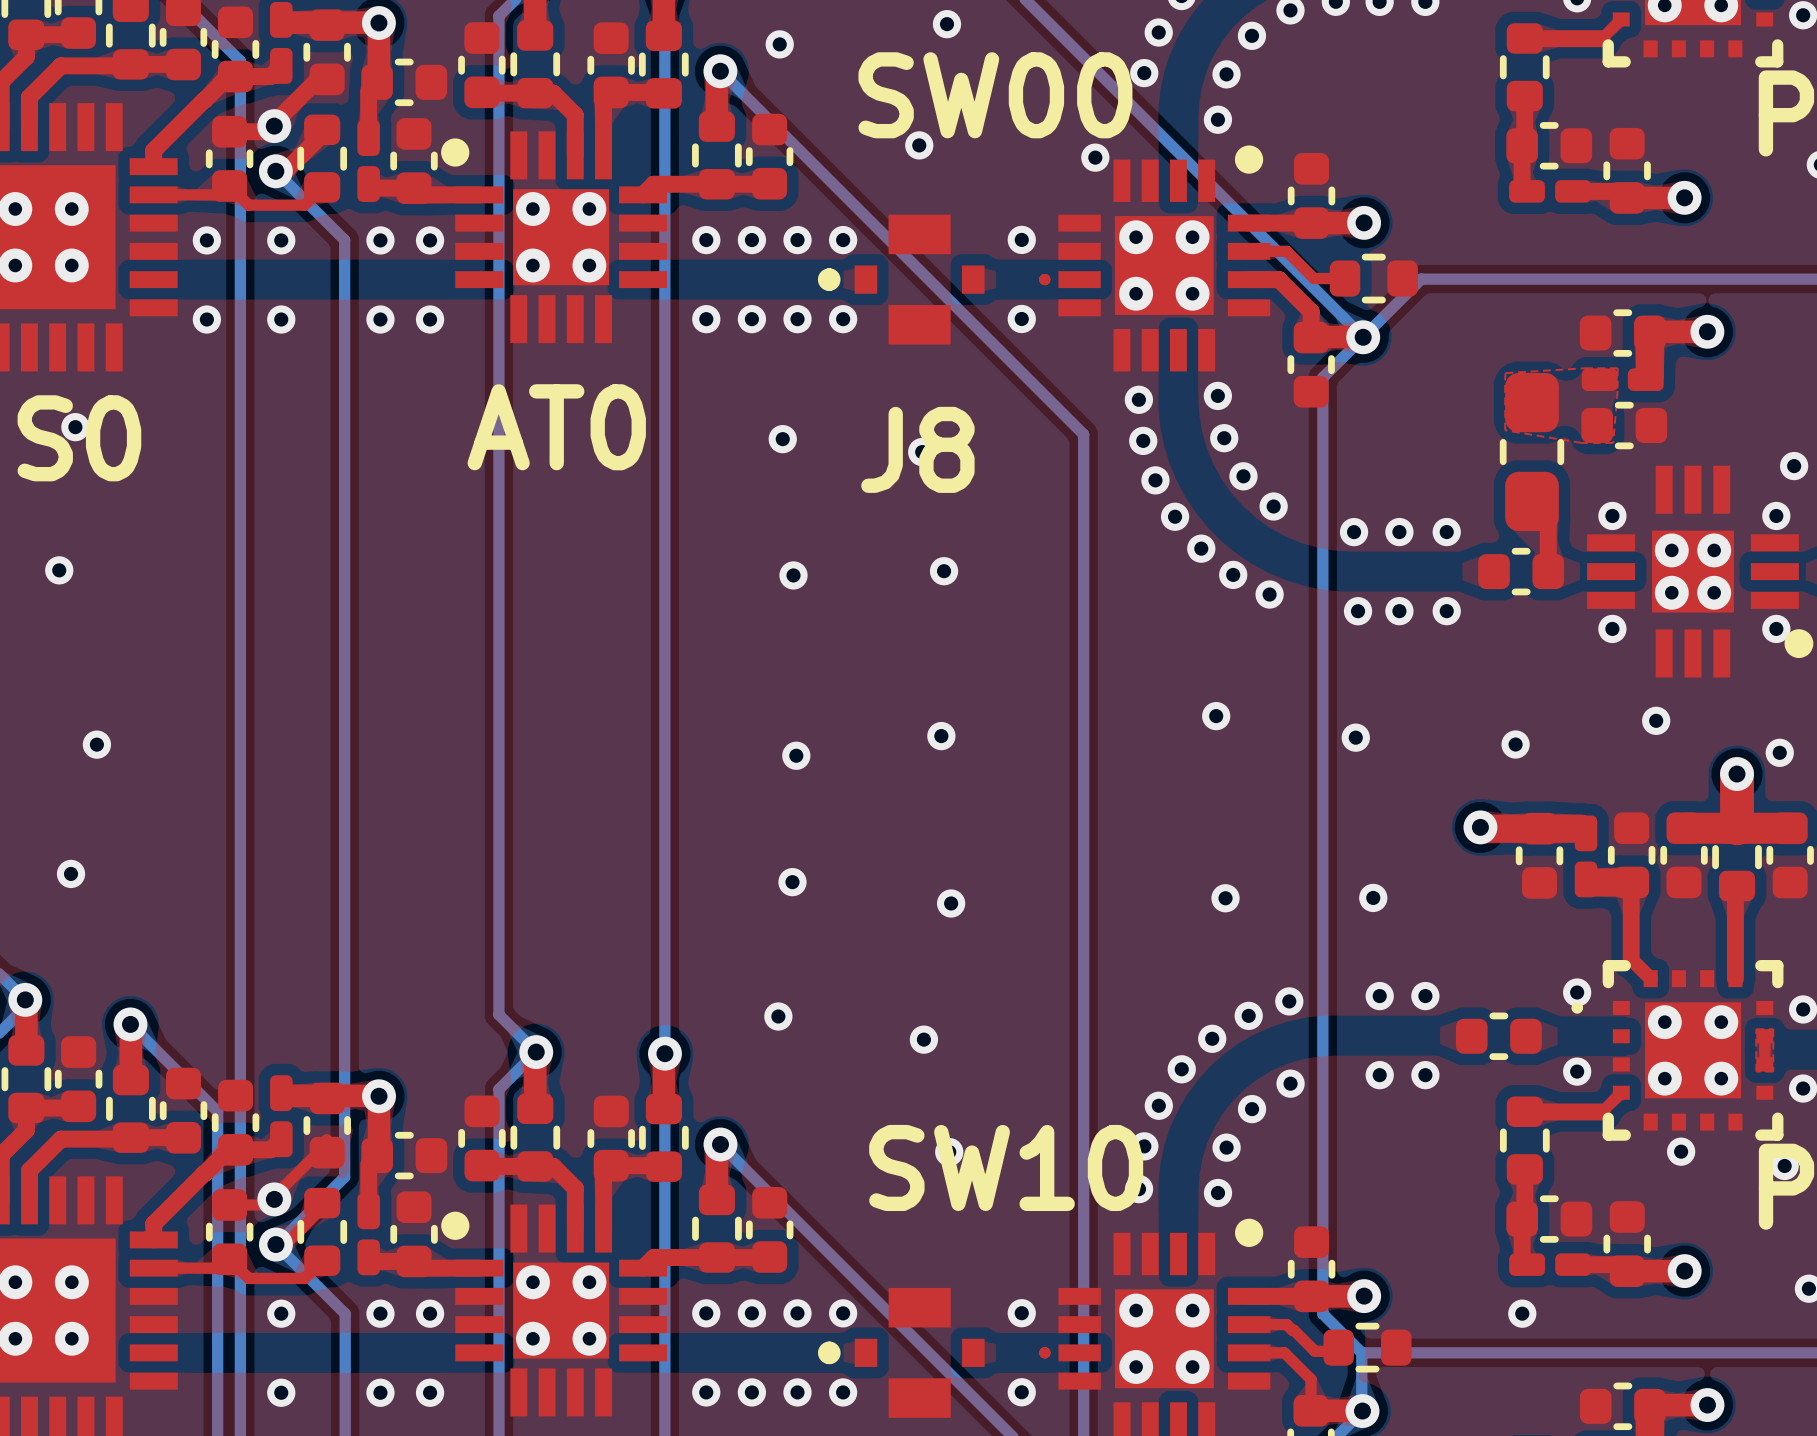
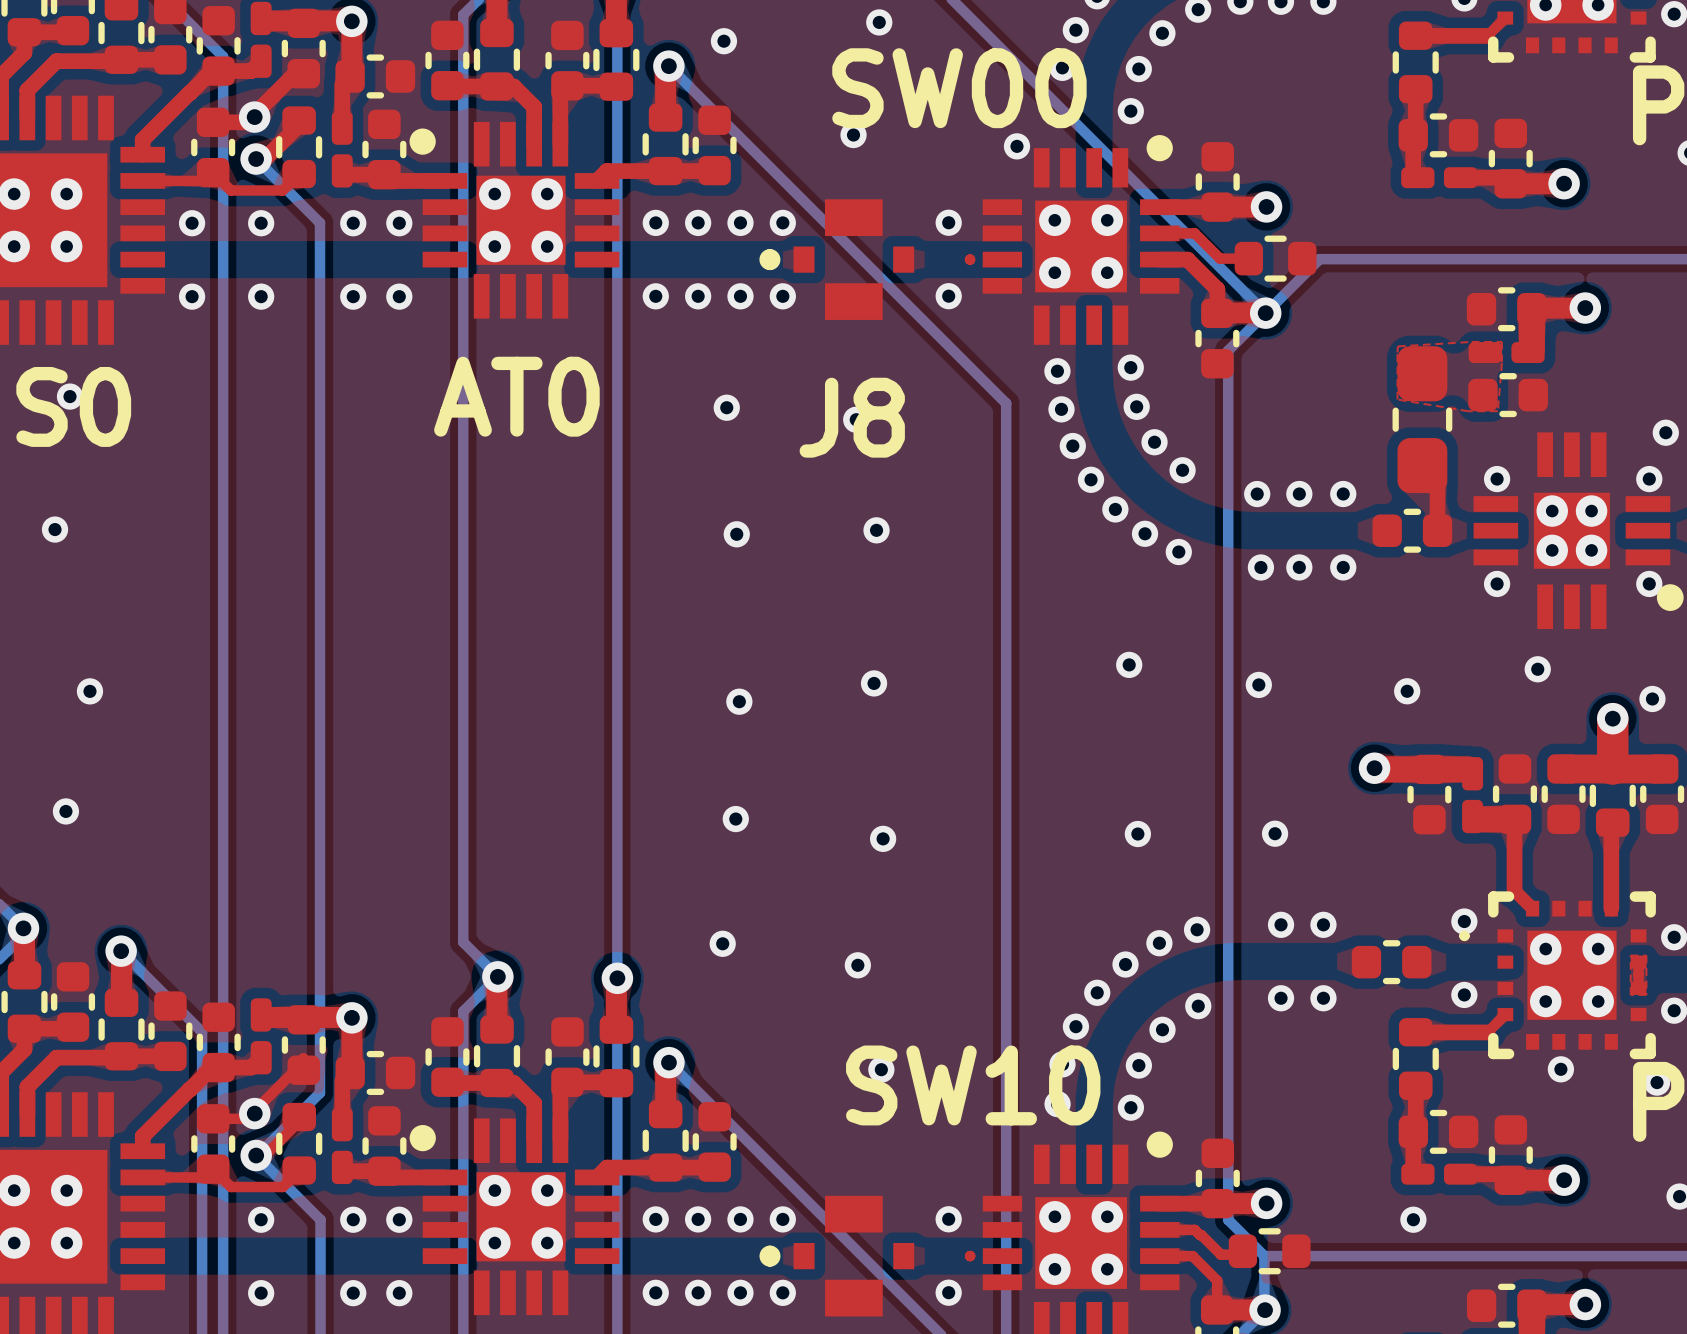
SW00 name position: SW00 (995, 95) -> SW00 (959, 88)
SW10 name position: SW10 (1006, 1167) -> SW10 (973, 1085)

